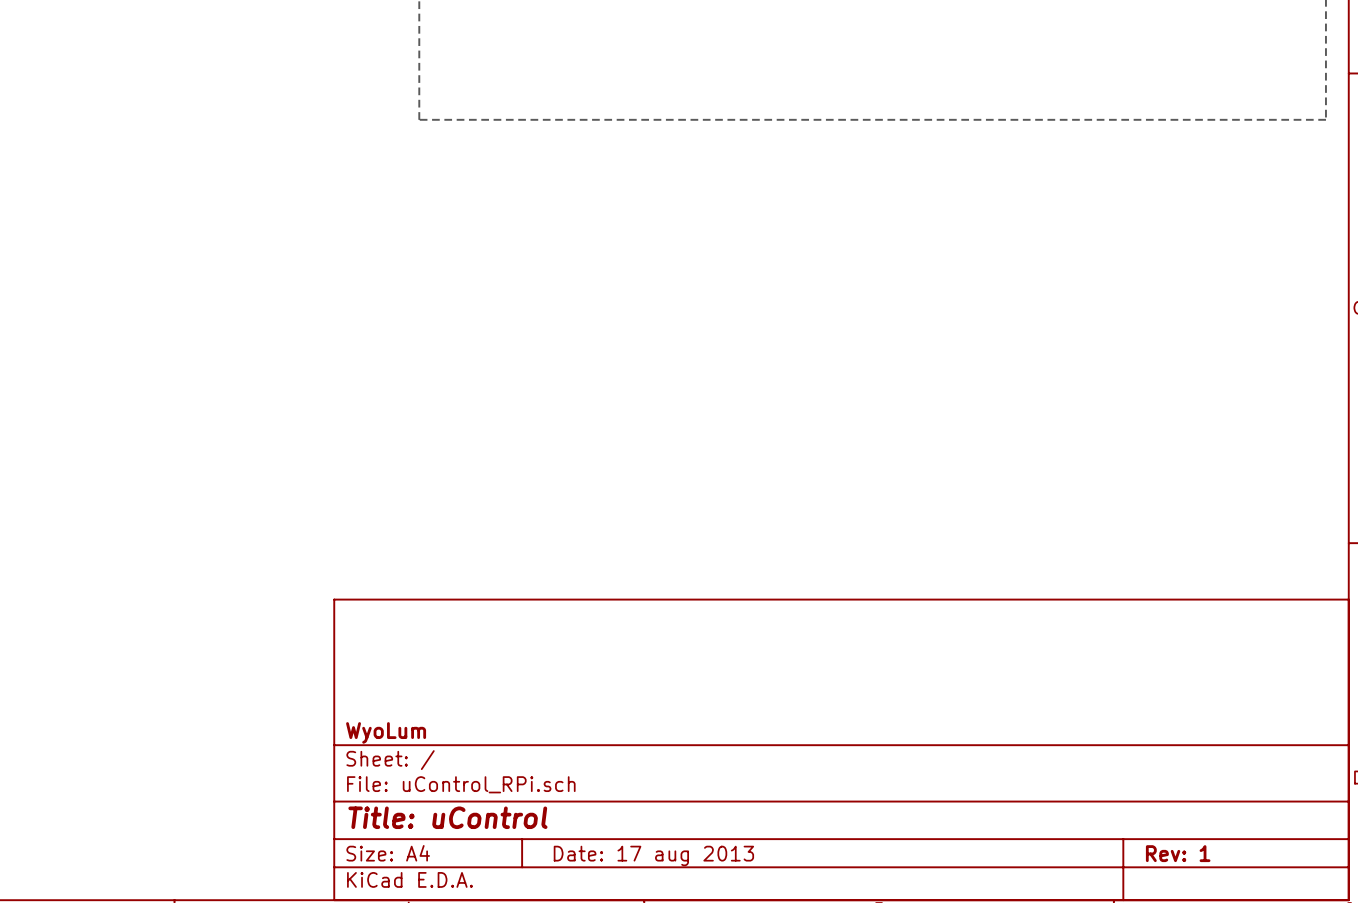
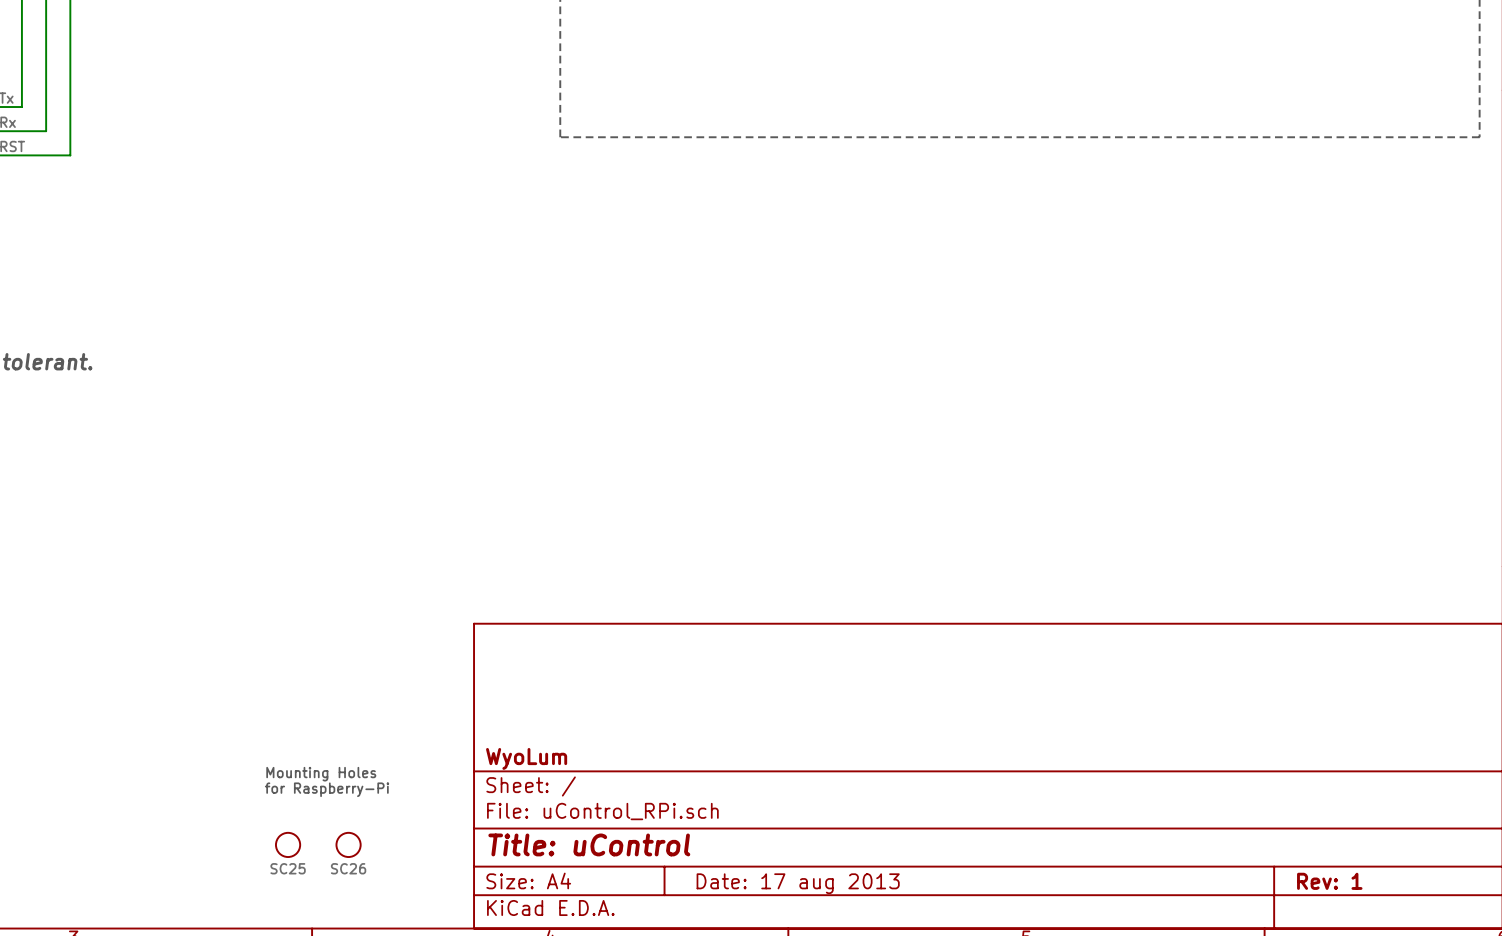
text: none -> Mounting Holes (321, 774)
text: none -> for Raspberry-Pi (327, 789)
SC25: none -> (288, 844)
SC26: none -> (348, 844)

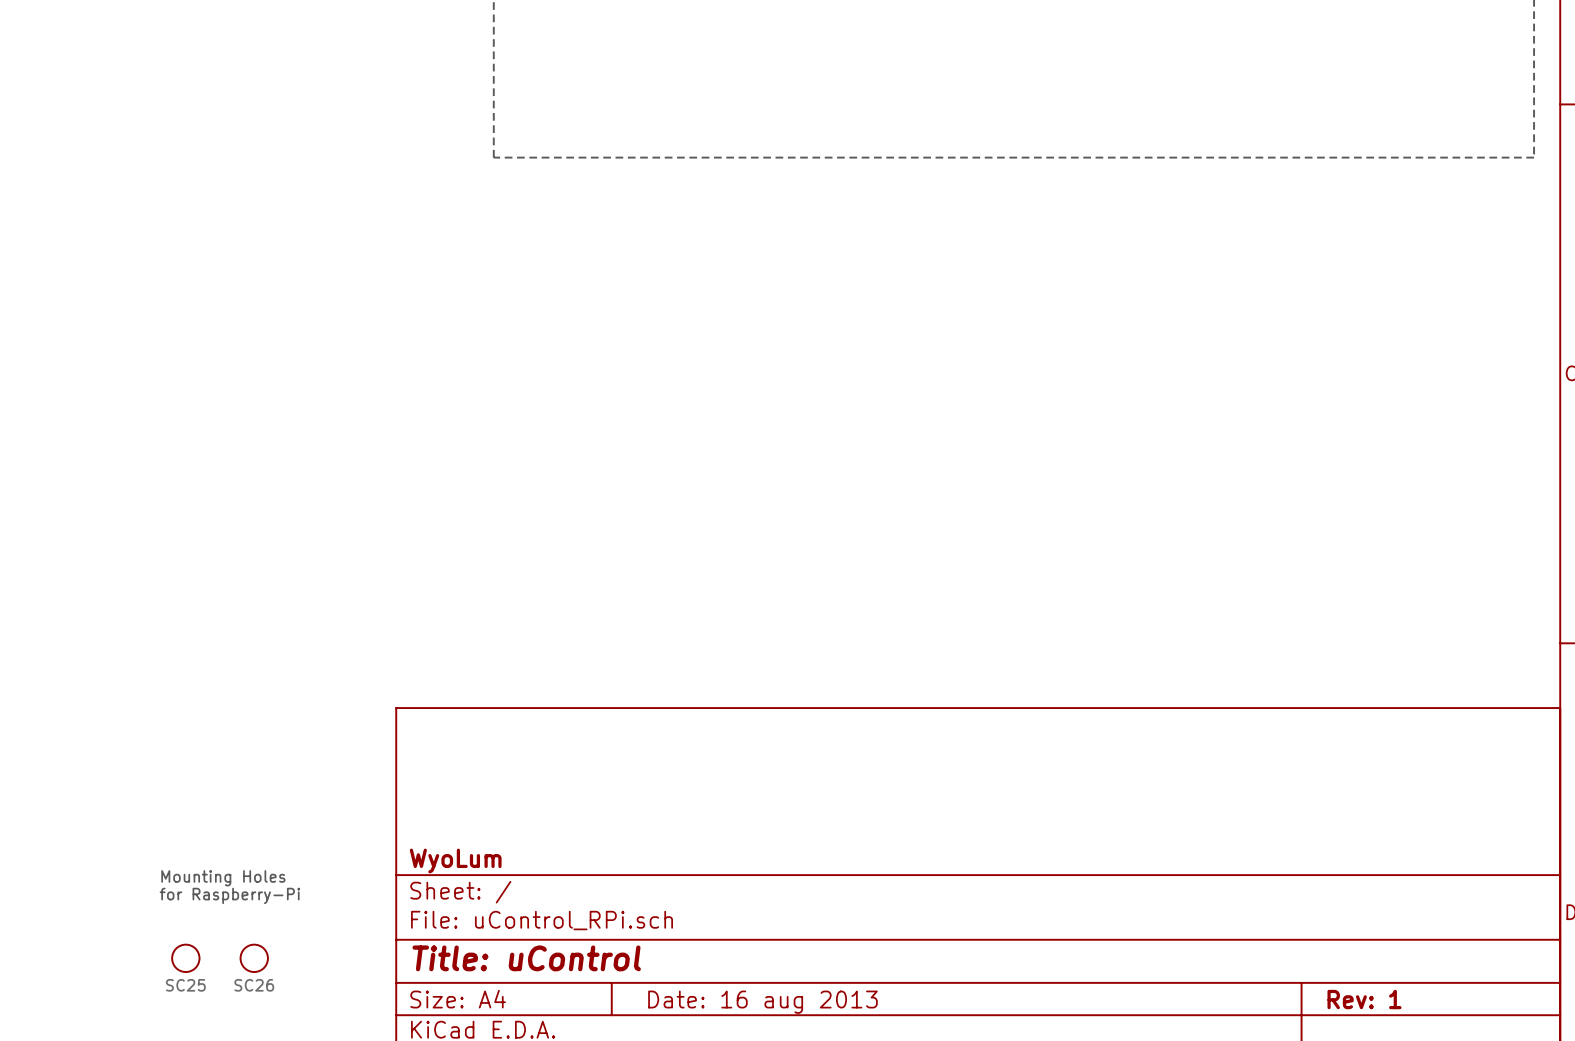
title block: Date: 17 aug 2013 (798, 883) -> Date: 16 aug 2013 (762, 1002)

